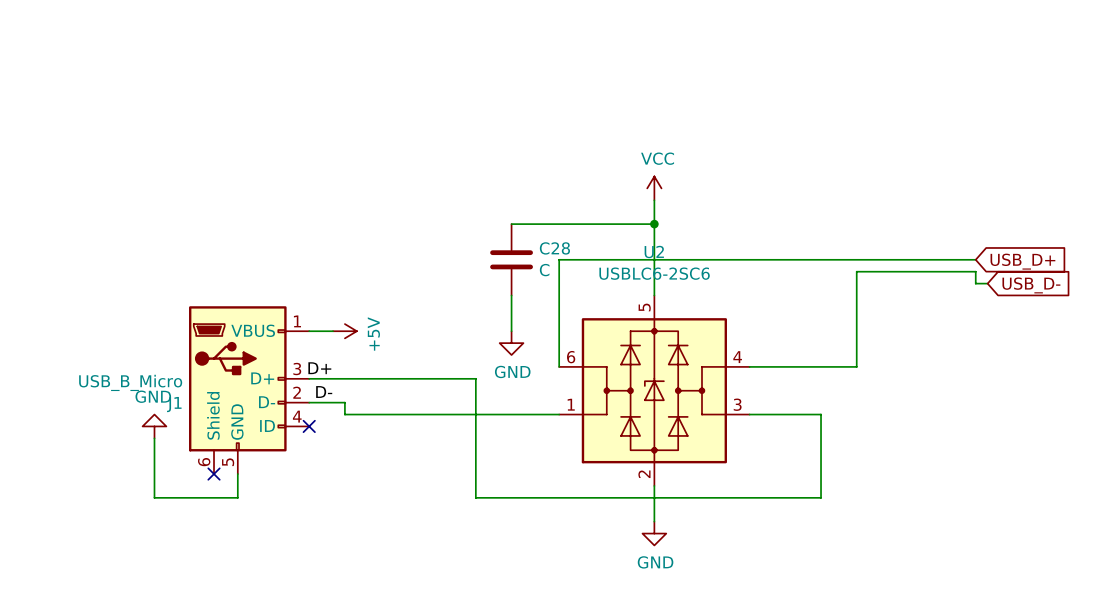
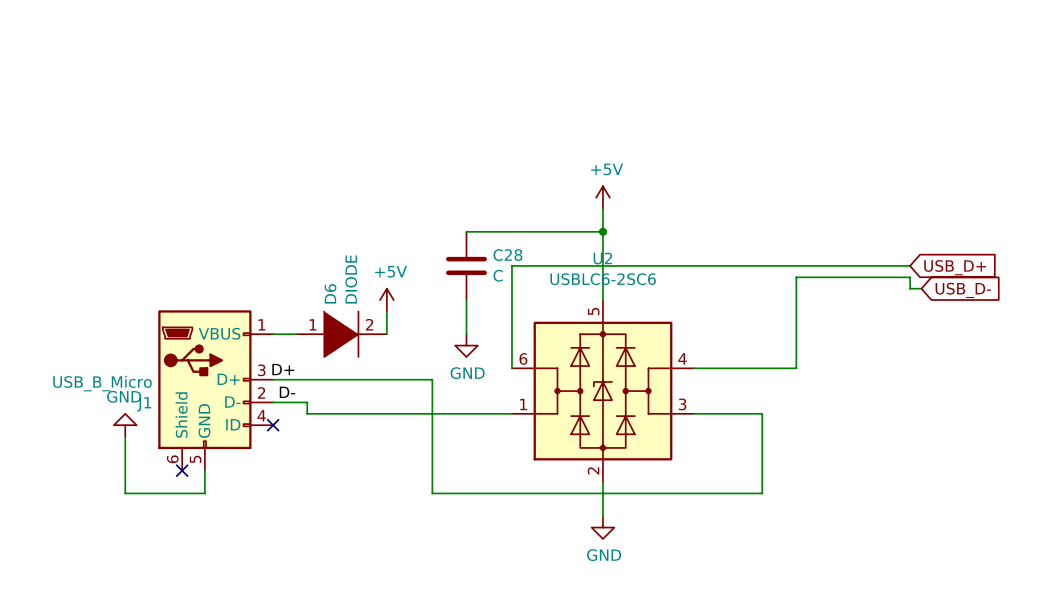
power symbol: VCC (654, 188) -> +5V (602, 197)
wire: none -> (386, 311) (386, 334)
power symbol rotation: 0° (344, 331) -> 90° counterclockwise (386, 300)
power symbol position: +5V (344, 331) -> +5V (386, 300)
D6: none -> DIODE (341, 334)

